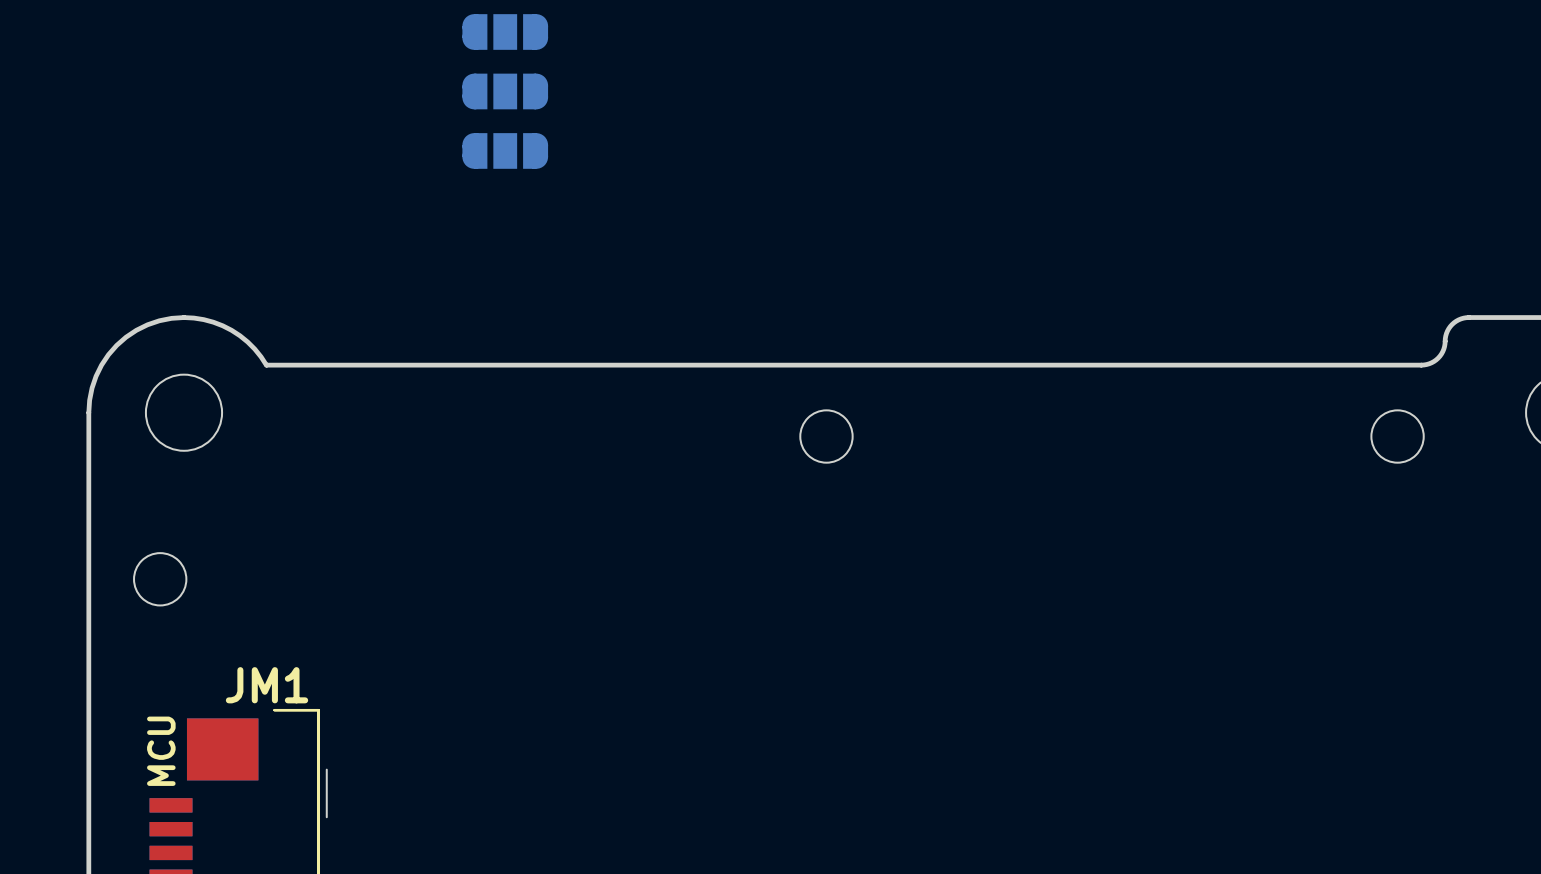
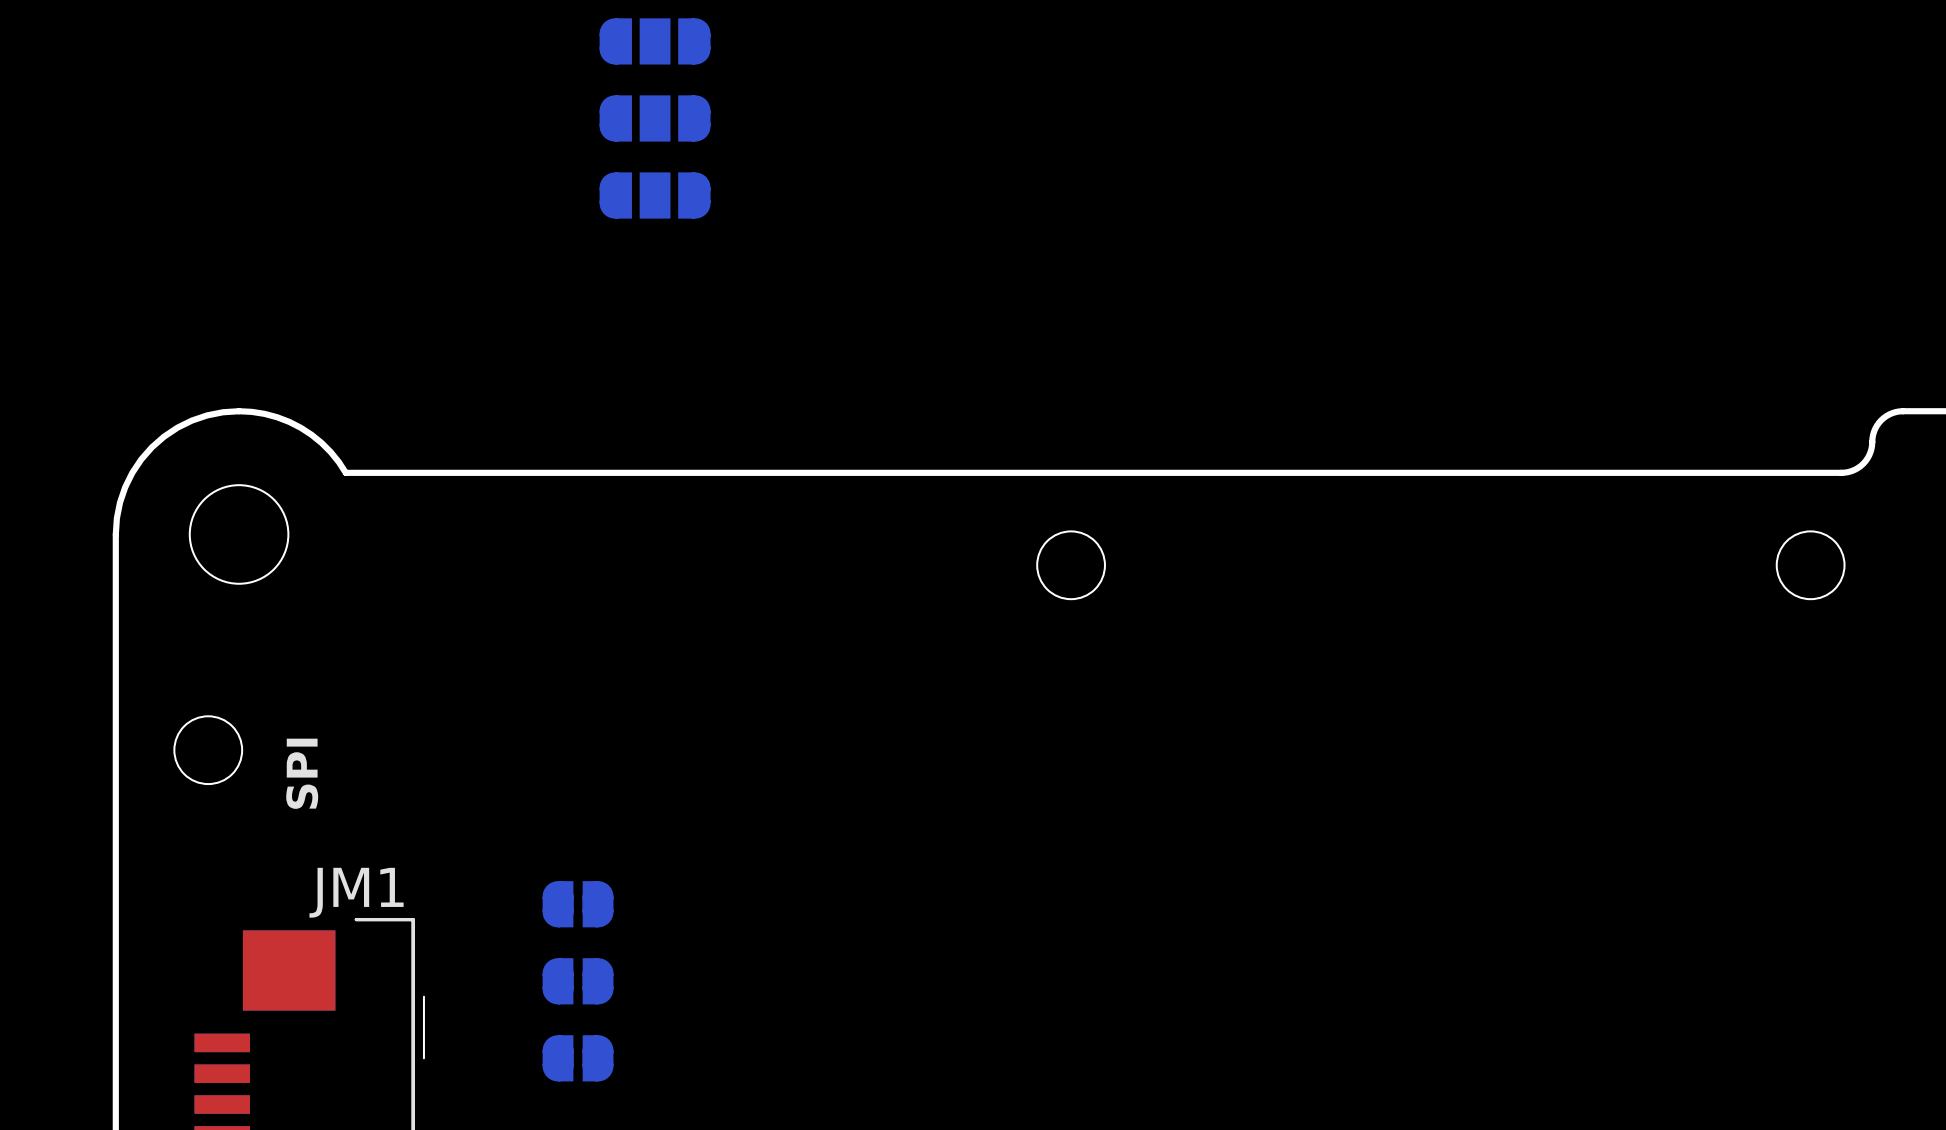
text: none -> SPI (302, 773)
part: none -> (578, 904)
text: MCU (161, 751) -> none
part: none -> (578, 981)
part: none -> (578, 1058)

